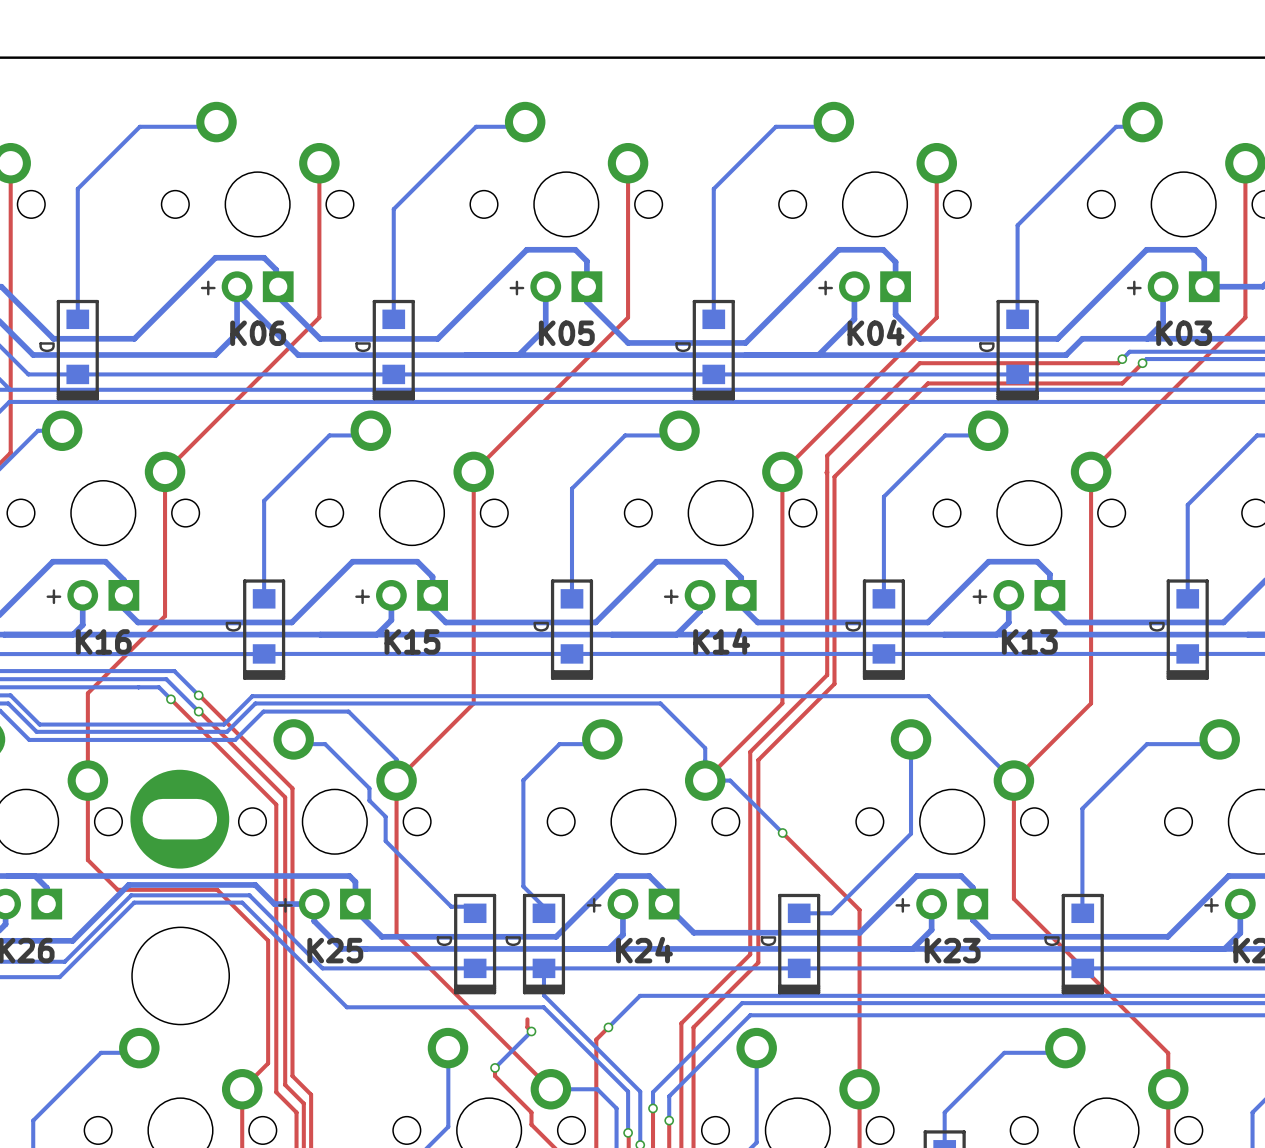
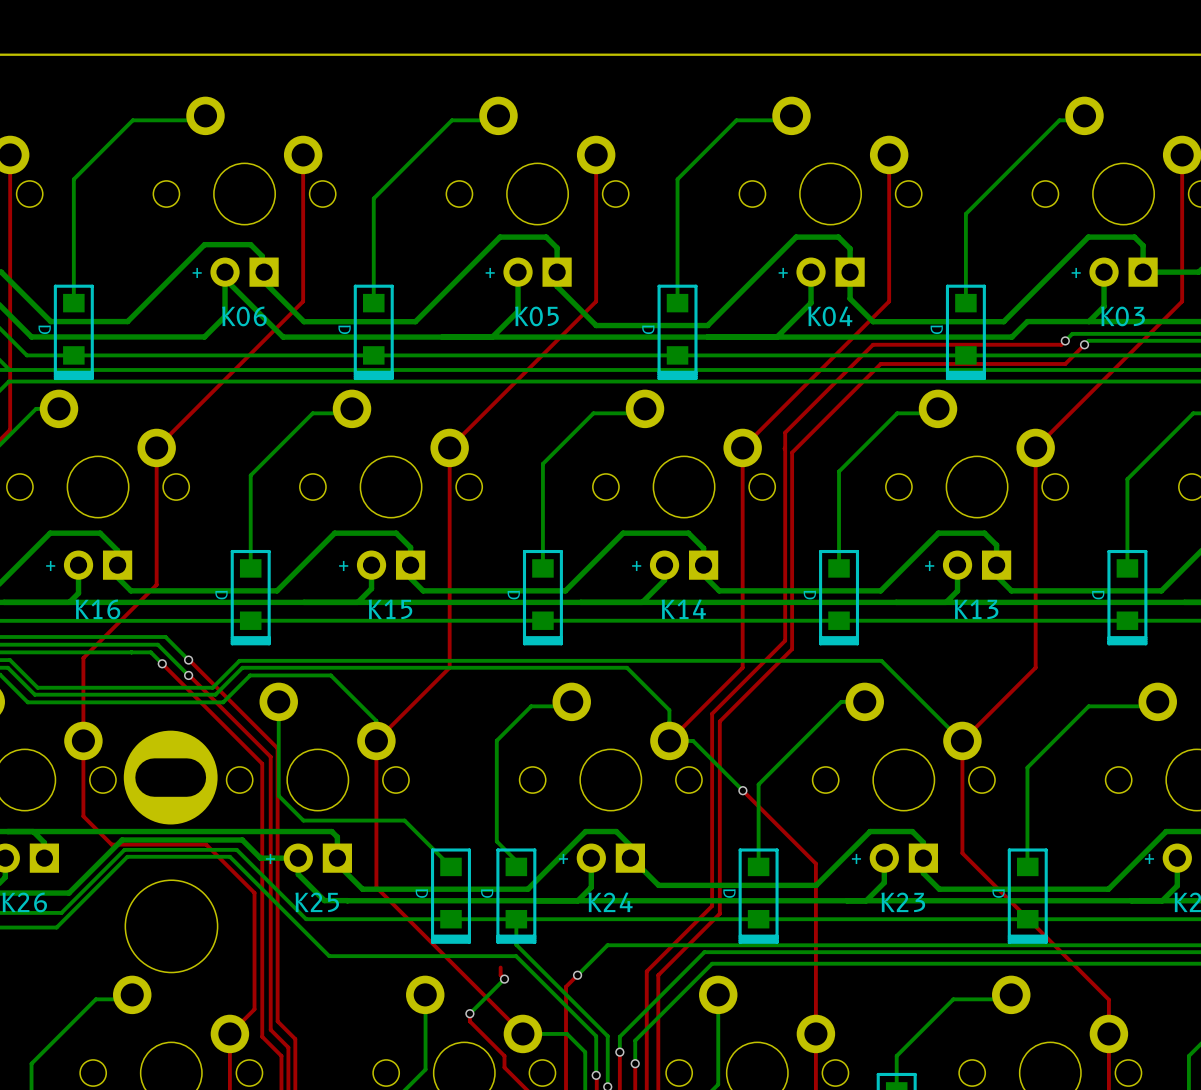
bottom track: none -> (278, 701) (278, 795) (303, 820) (404, 820) (450, 866)
bottom track: (911, 739) (911, 833) (831, 913) (799, 913) -> (864, 701) (841, 701) (758, 784) (758, 866)
bottom track: (293, 744) (325, 744) (369, 788) (369, 800) (385, 816) (385, 841) (451, 906) (474, 906) -> none

